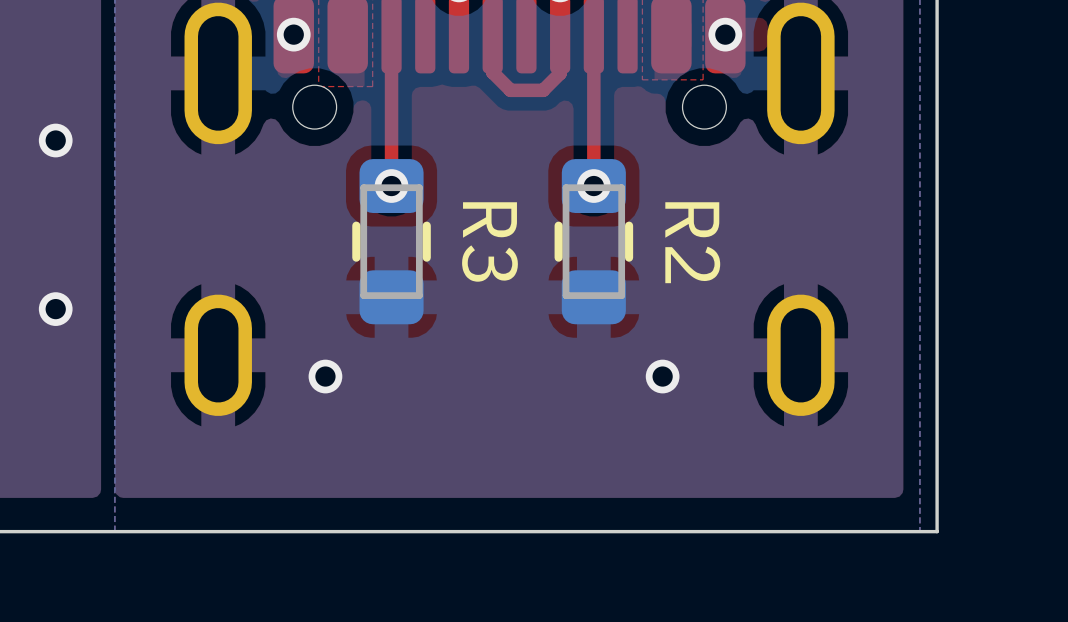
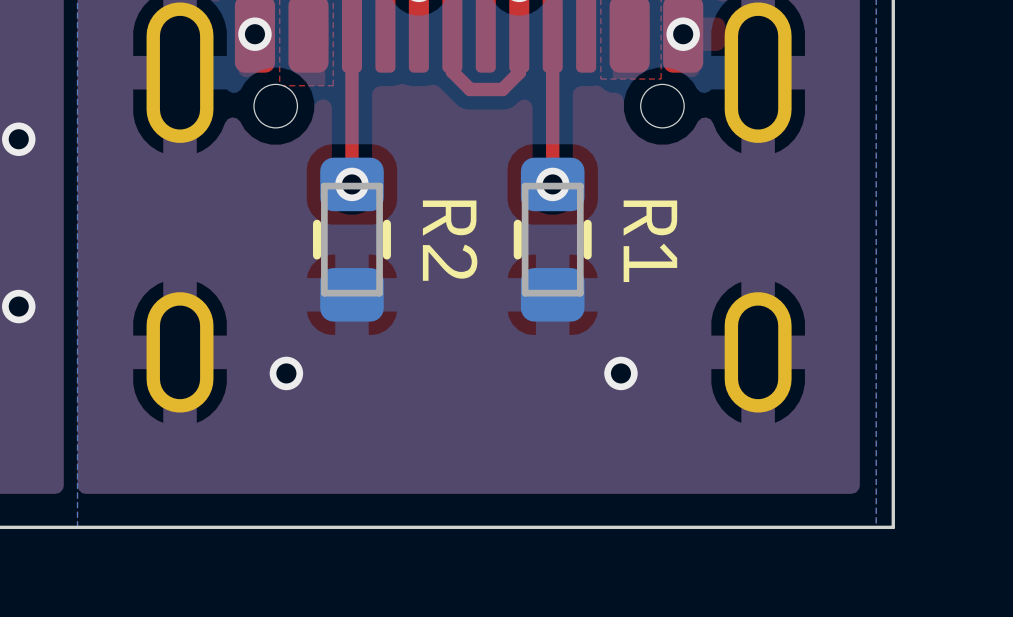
R3 name: R3 (489, 241) -> R2 (450, 240)
R2 name: R2 (692, 242) -> R1 (650, 241)

